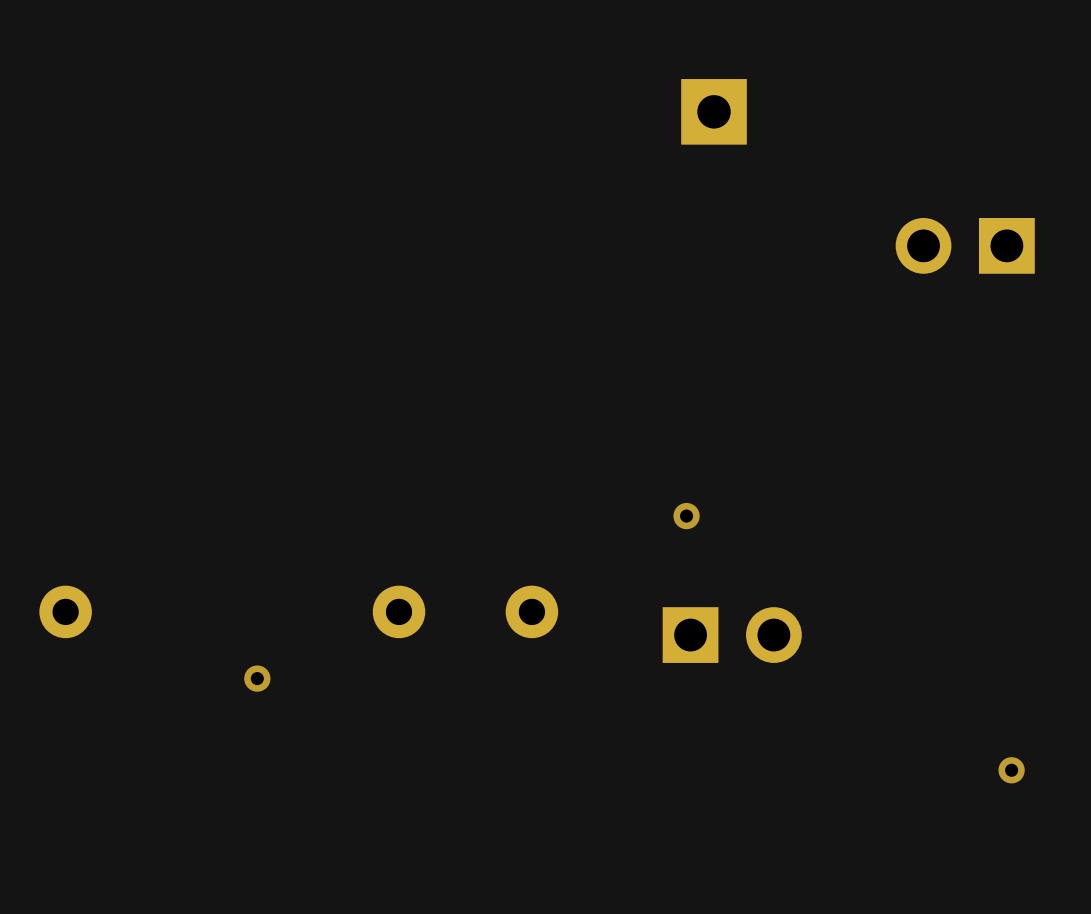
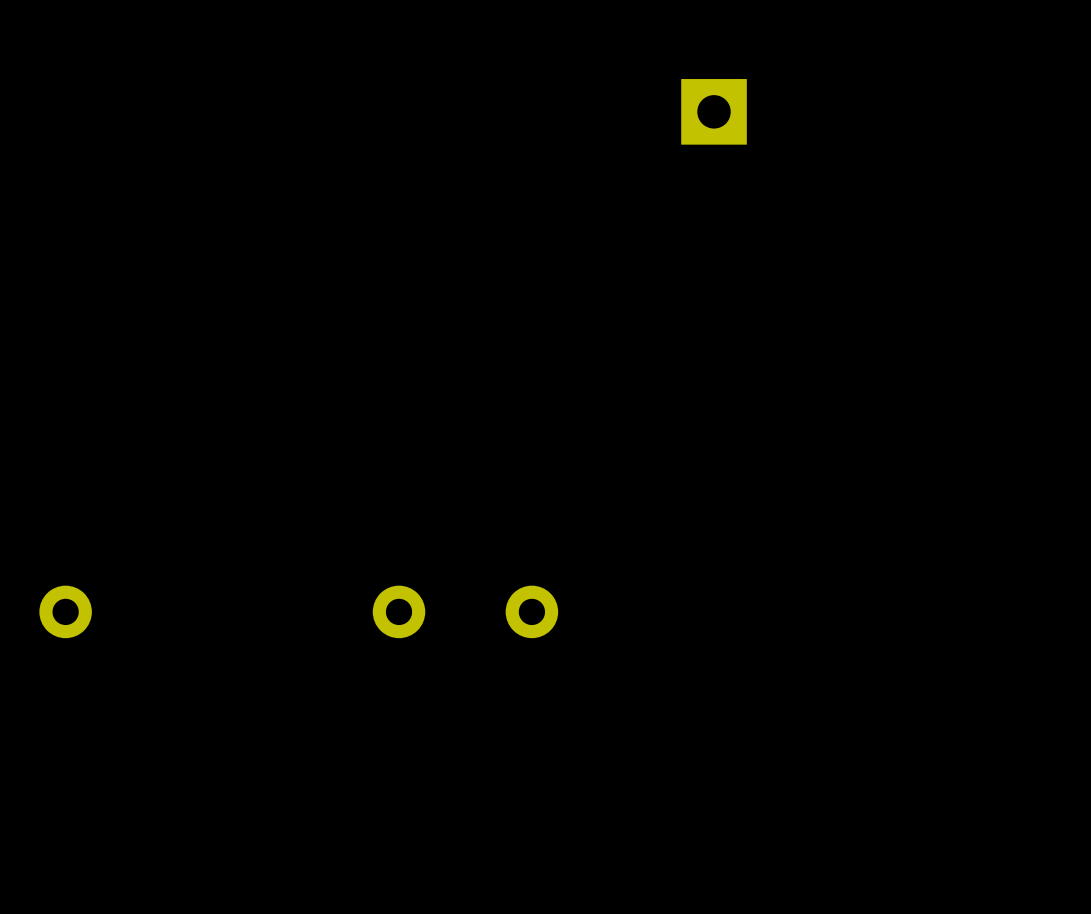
part: (965, 245) -> none
via: (686, 516) -> none
part: (732, 635) -> none
via: (257, 678) -> none
via: (1011, 770) -> none

